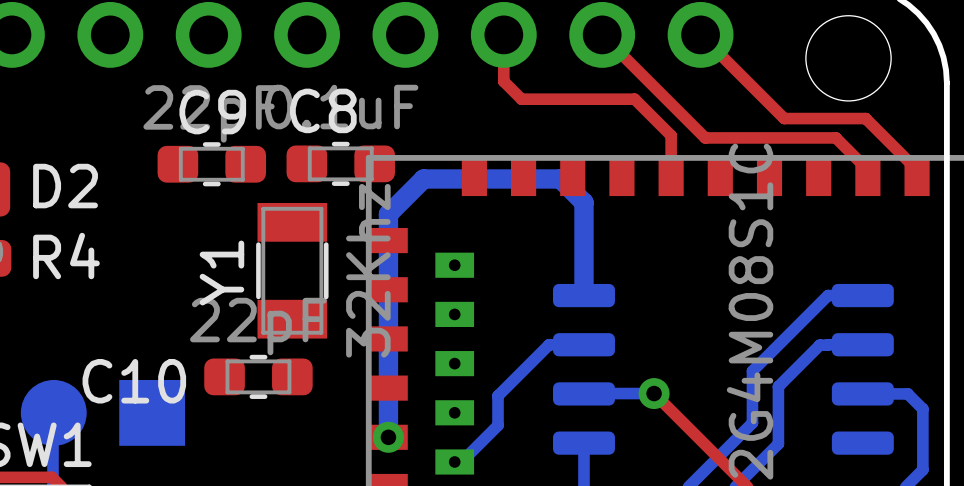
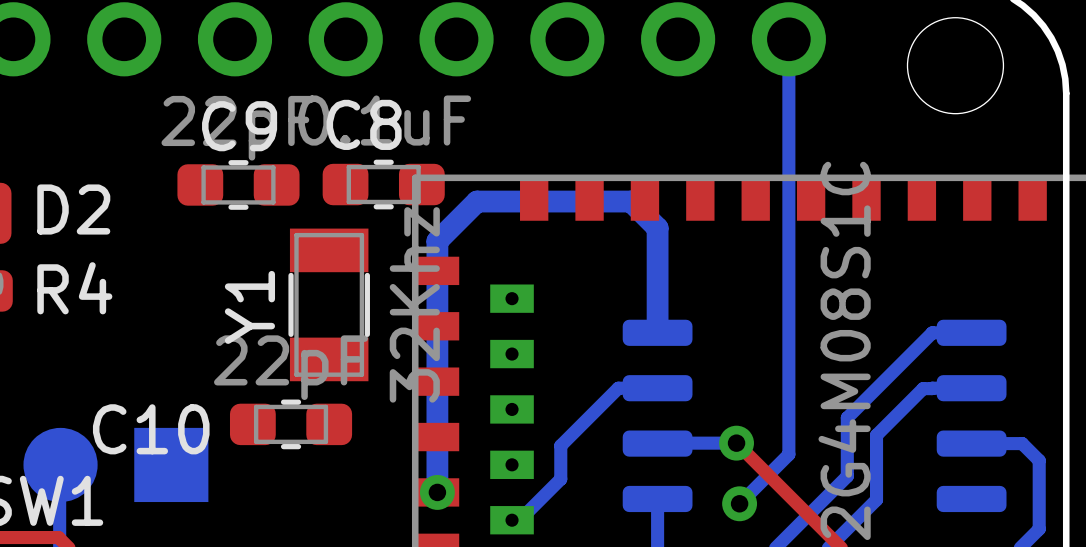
top track: (503, 34) (503, 81) (521, 99) (634, 99) (671, 135) (671, 176) -> none
top track: (602, 34) (705, 137) (835, 137) (867, 169) (867, 176) -> none
top track: (700, 34) (784, 118) (865, 118) (917, 169) (917, 176) -> none
bottom track: none -> (788, 39) (788, 454) (739, 503)
via: none -> (739, 503)

